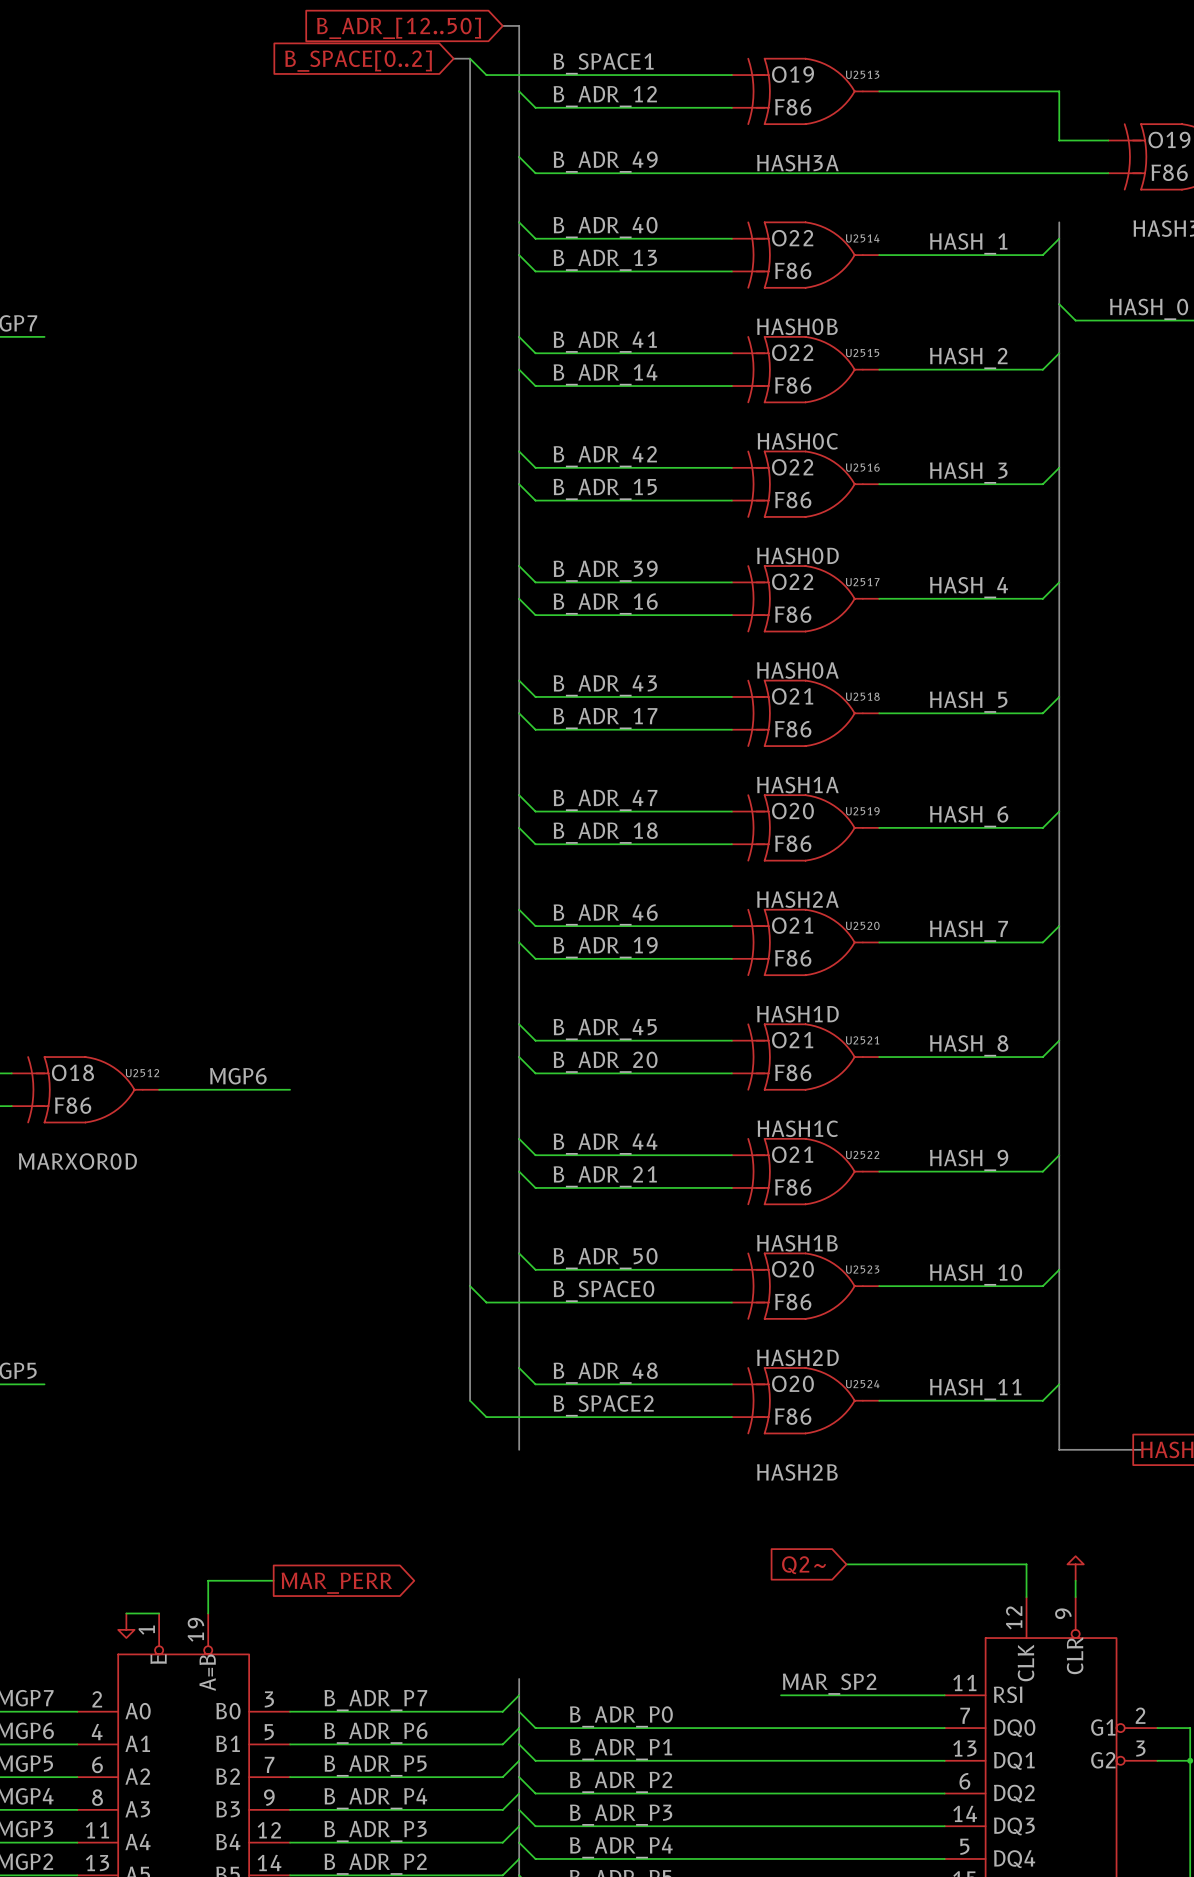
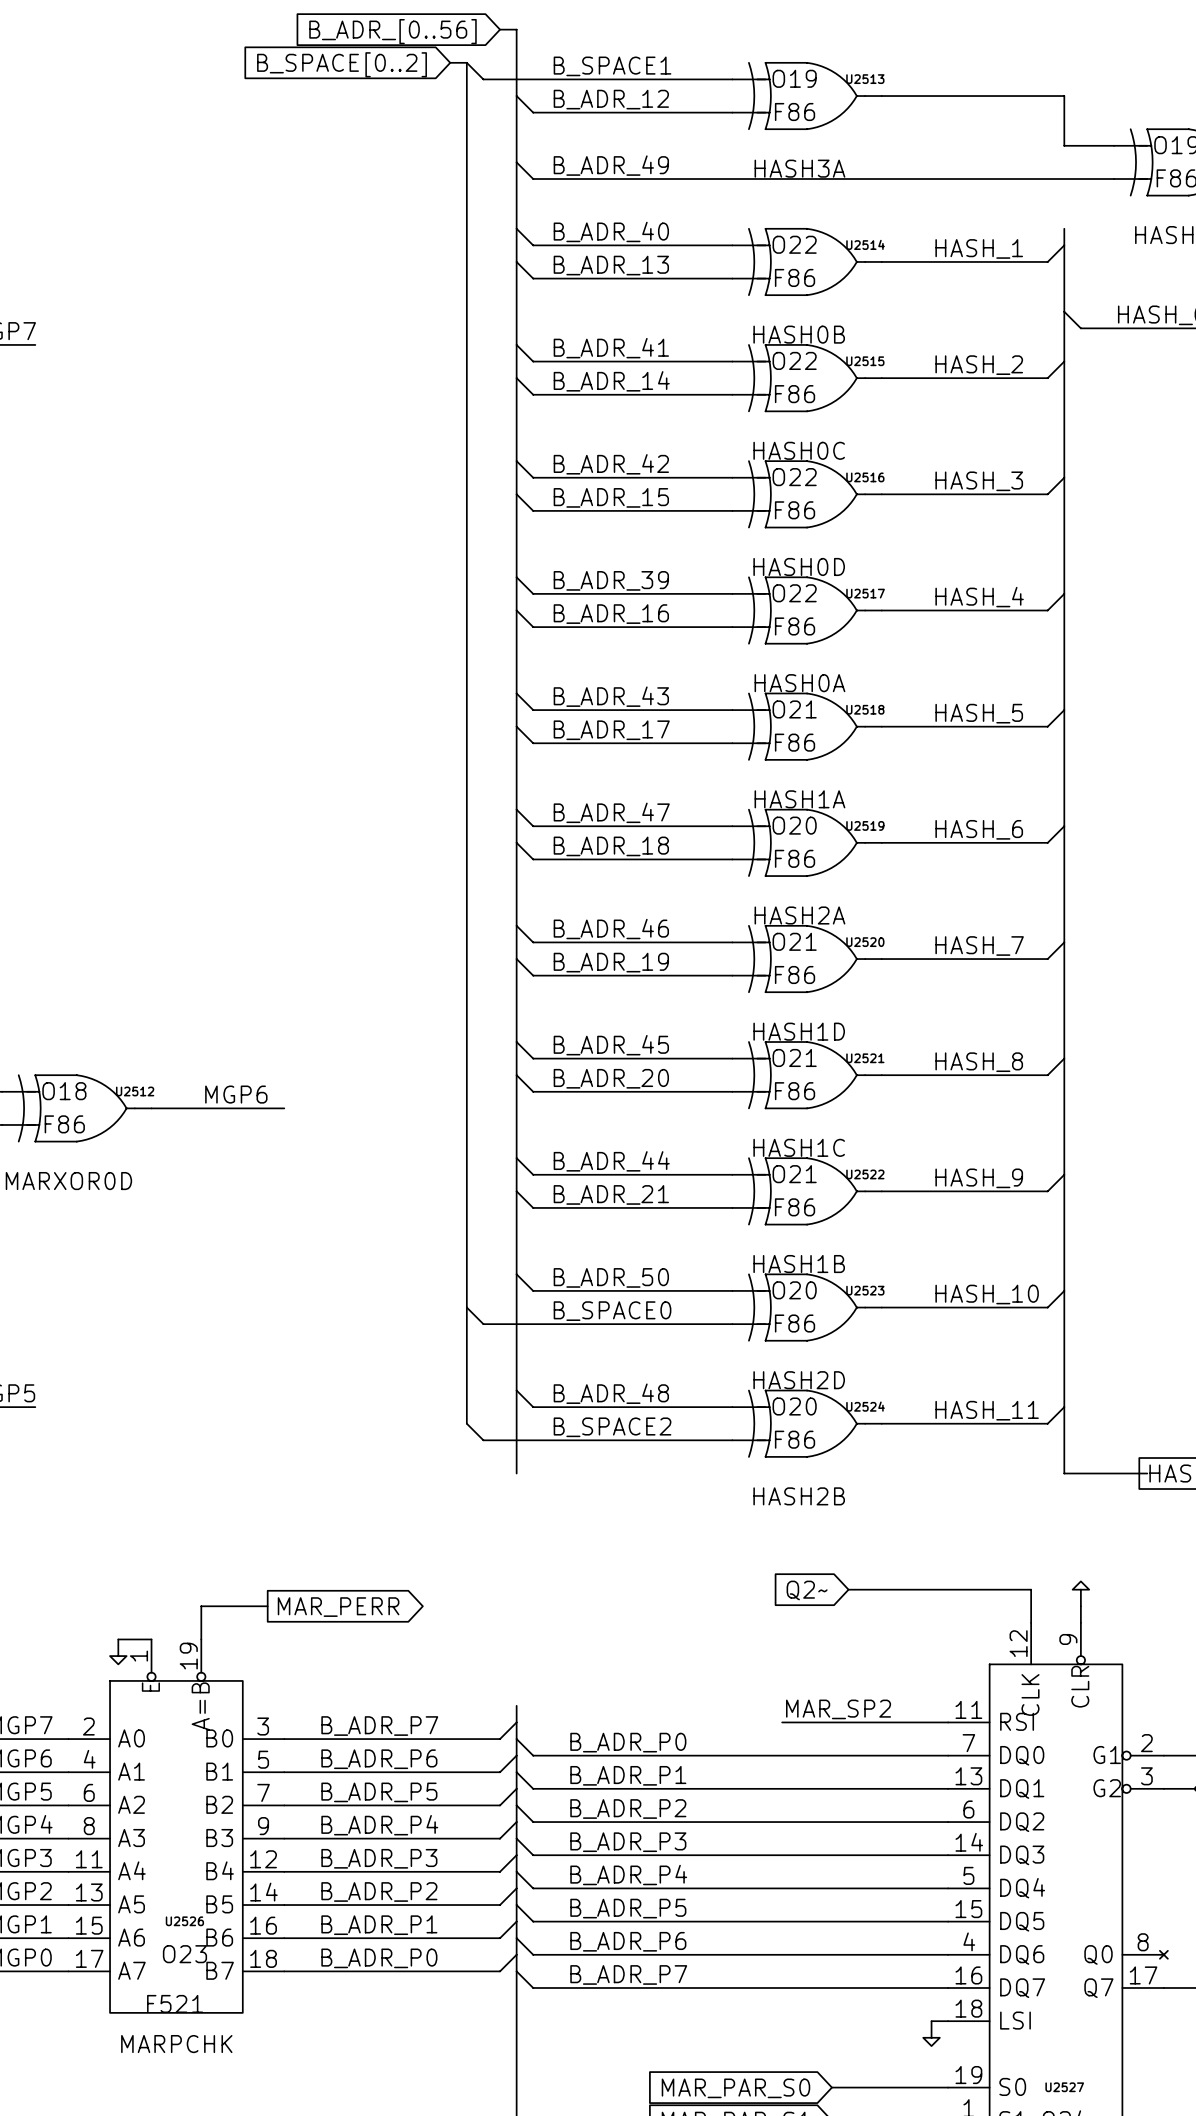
global label: B_ADR_[12..50] (399, 28) -> B_ADR_[0..56] (392, 31)

